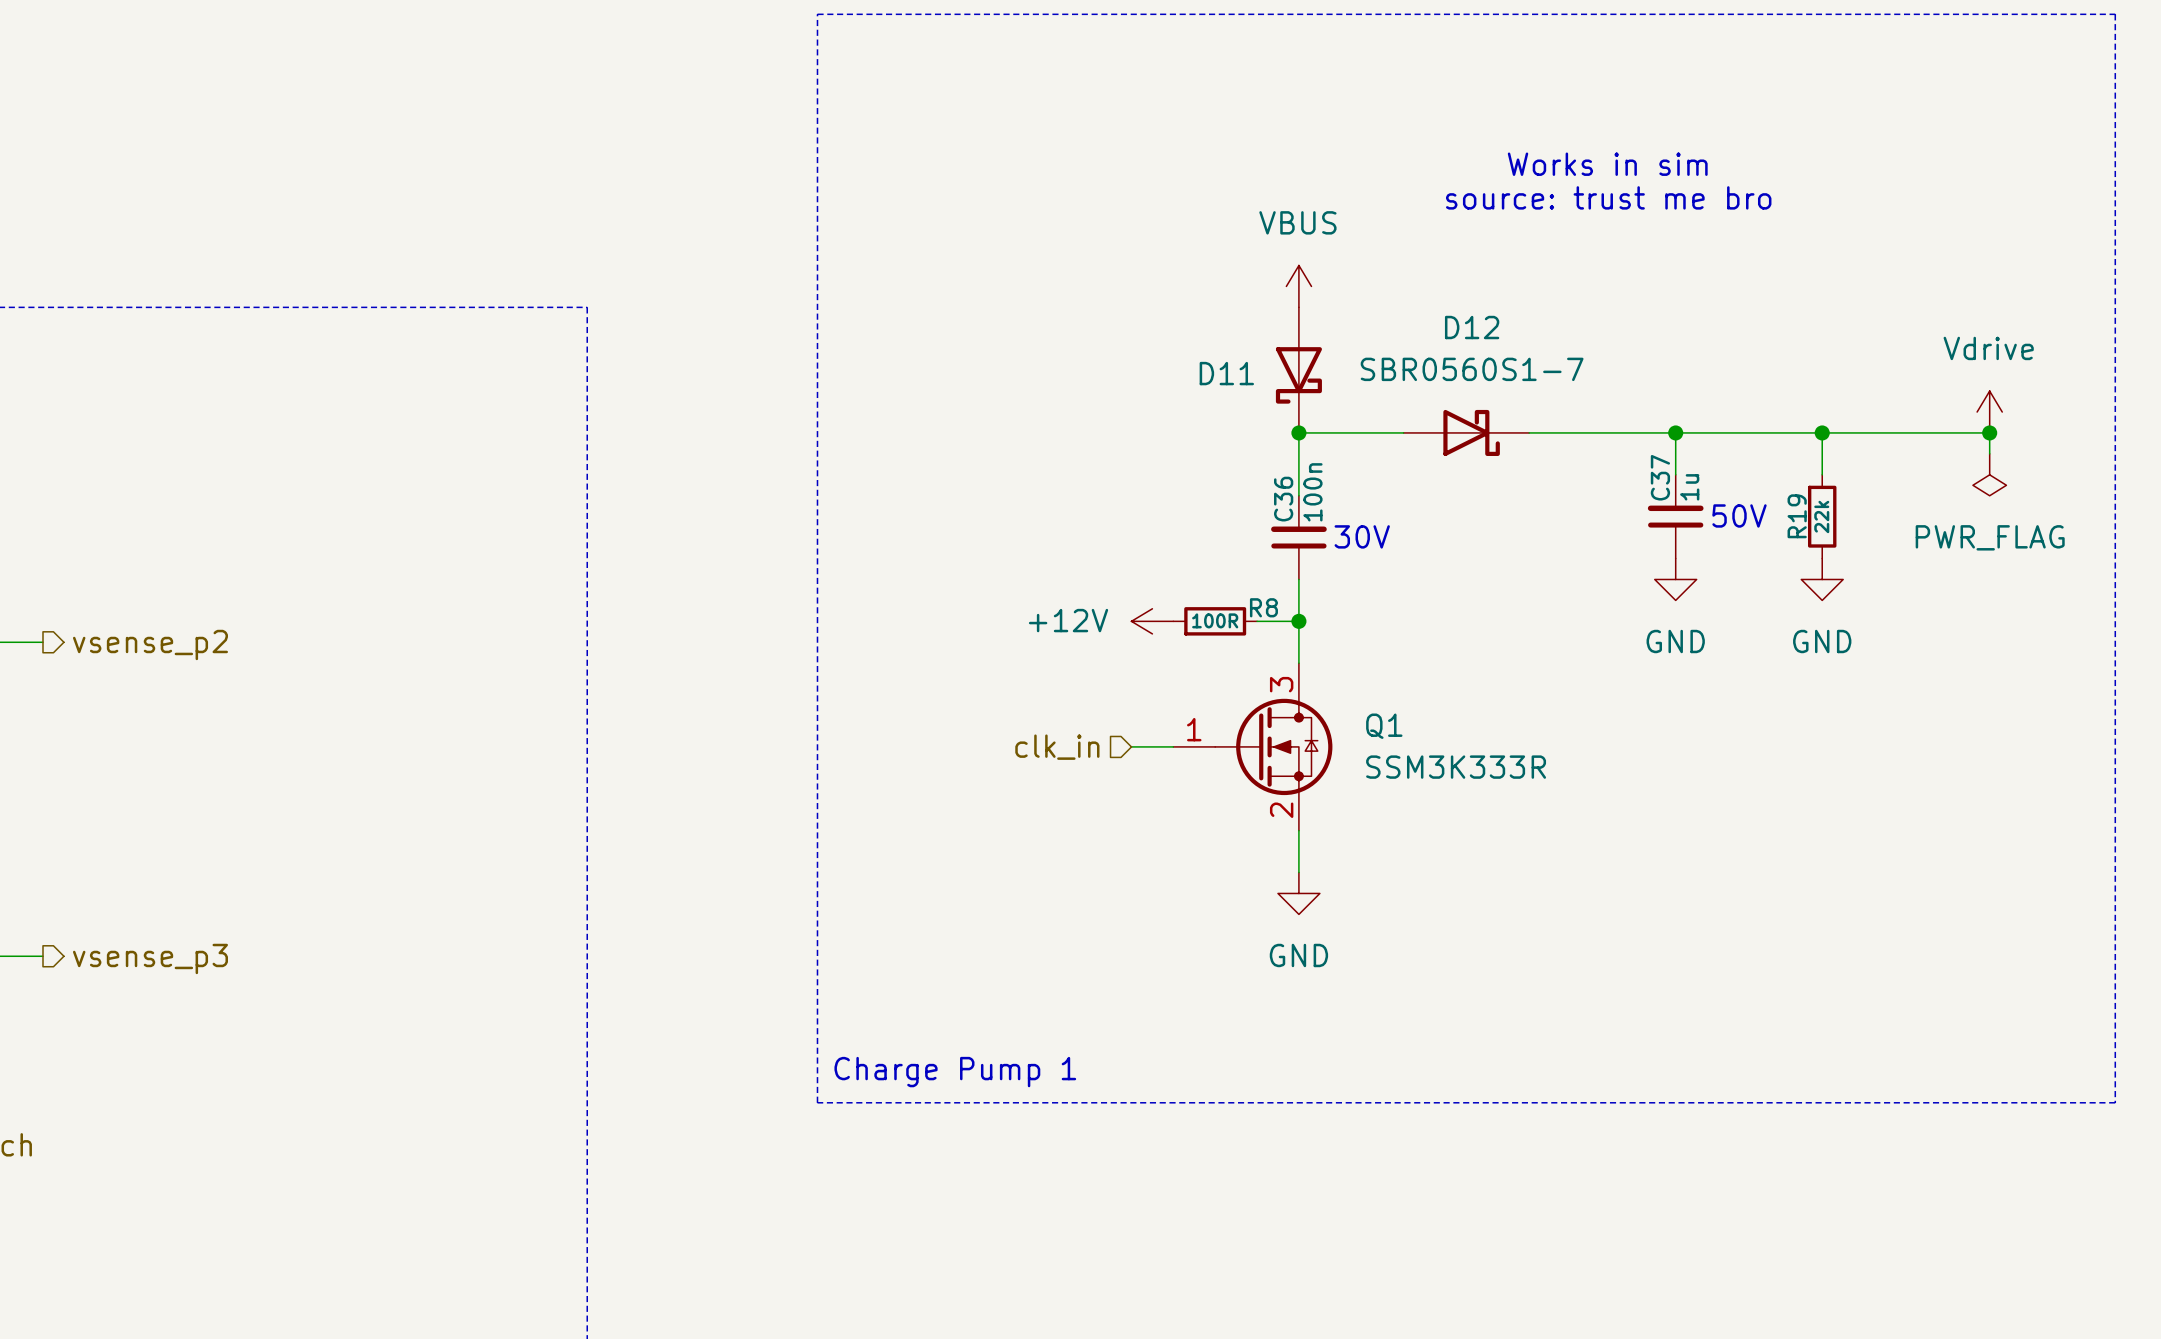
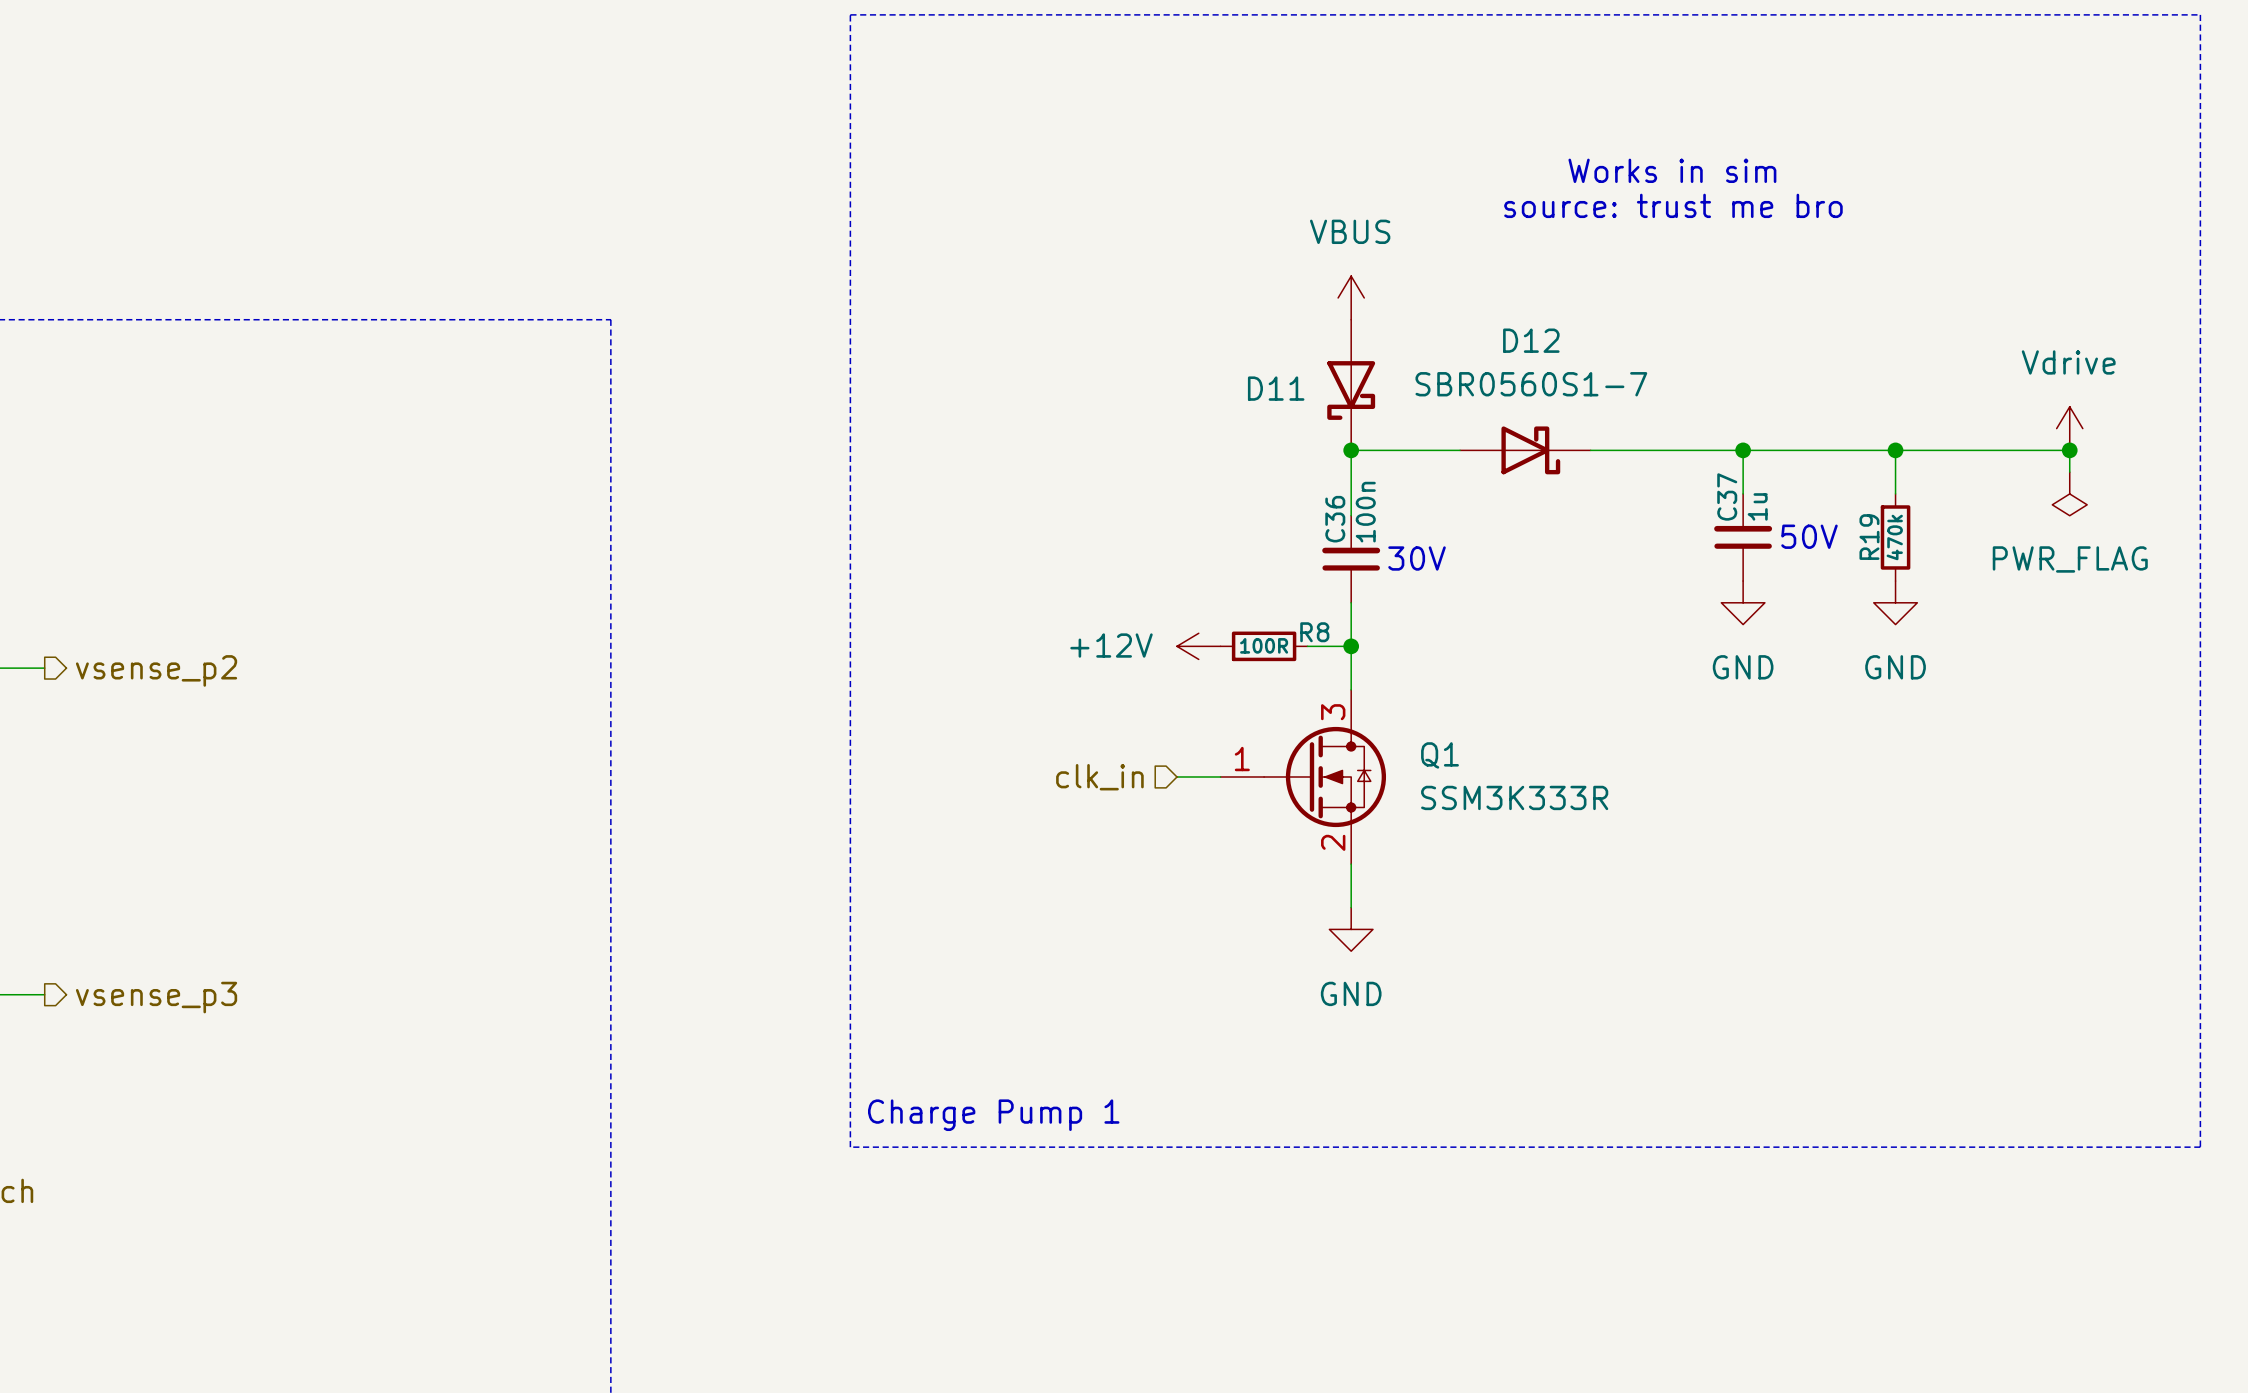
R19 value: 22k (1821, 516) -> 470k (1894, 537)

